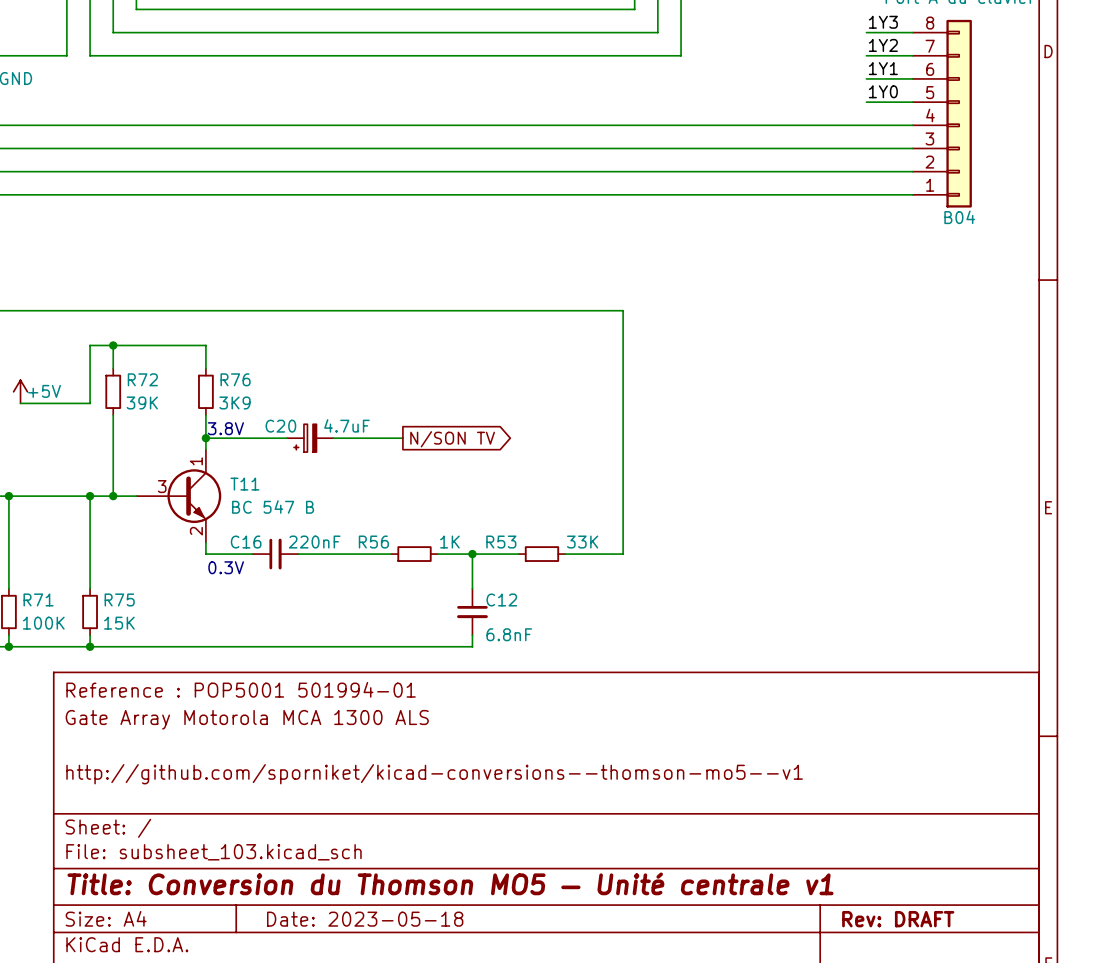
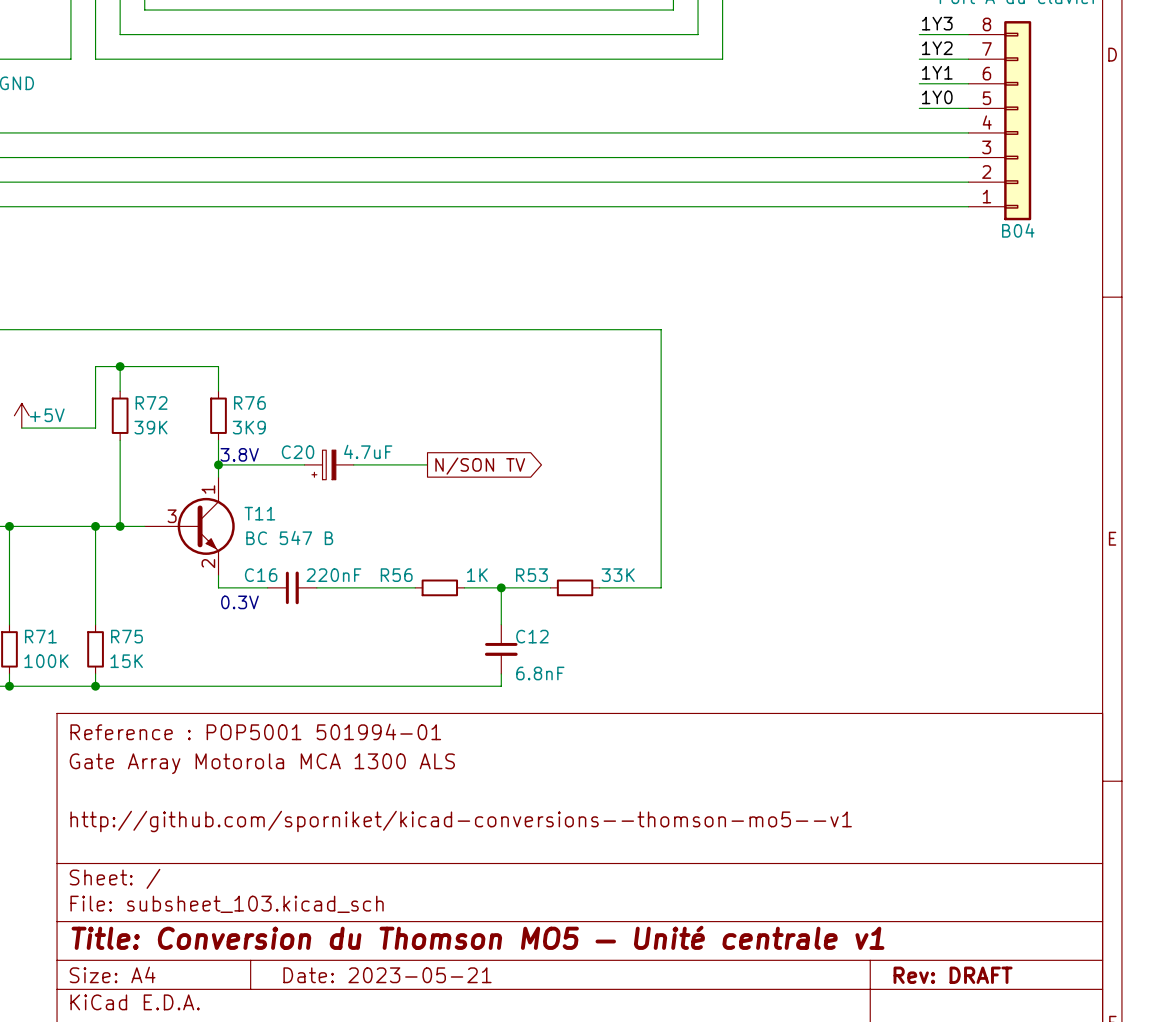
title block: Date: 2023-05-18 (365, 919) -> Date: 2023-05-21 (387, 975)

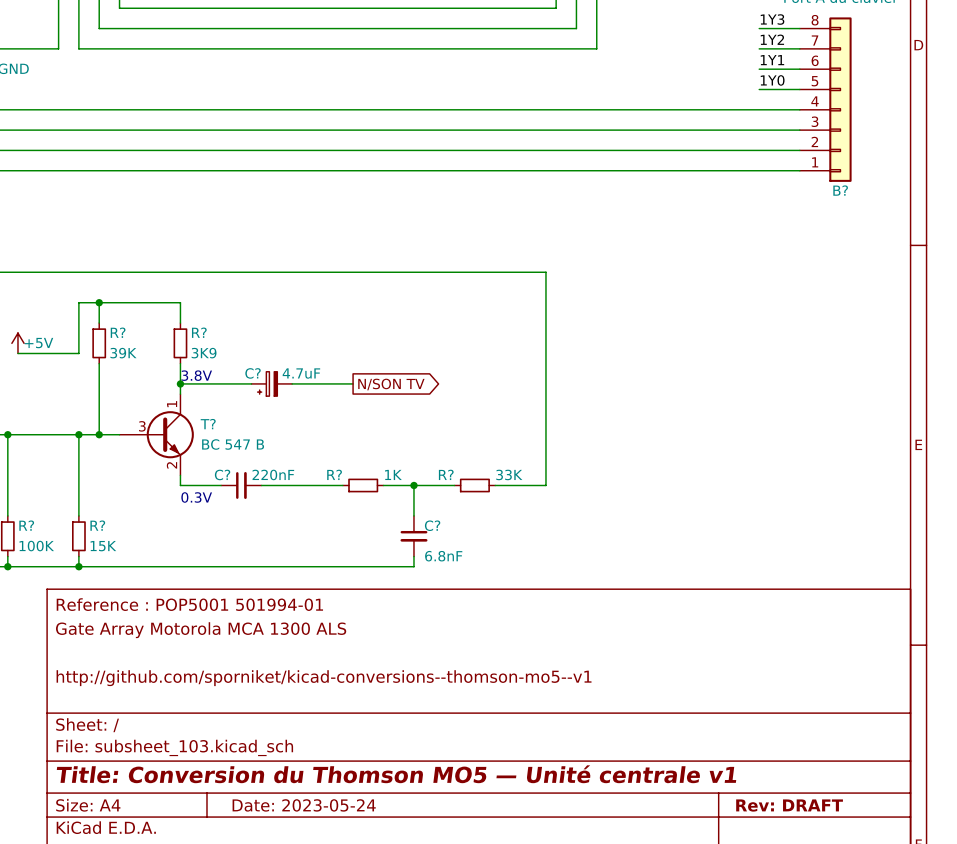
B04 name: B04 (1018, 230) -> B? (840, 190)
R72 name: R72 (151, 402) -> R? (118, 332)
R76 name: R76 (249, 402) -> R? (199, 332)
C20 name: C20 (298, 452) -> C? (253, 373)
T11 name: T11 (259, 513) -> T? (208, 424)
C16 name: C16 (261, 575) -> C? (222, 474)
R56 name: R56 (396, 575) -> R? (334, 474)
R53 name: R53 (531, 575) -> R? (446, 474)
R71 name: R71 (40, 636) -> R? (26, 525)
R75 name: R75 (126, 636) -> R? (97, 525)
C12 name: C12 (532, 636) -> C? (432, 525)
title block: Date: 2023-05-21 (387, 975) -> Date: 2023-05-24 (304, 805)

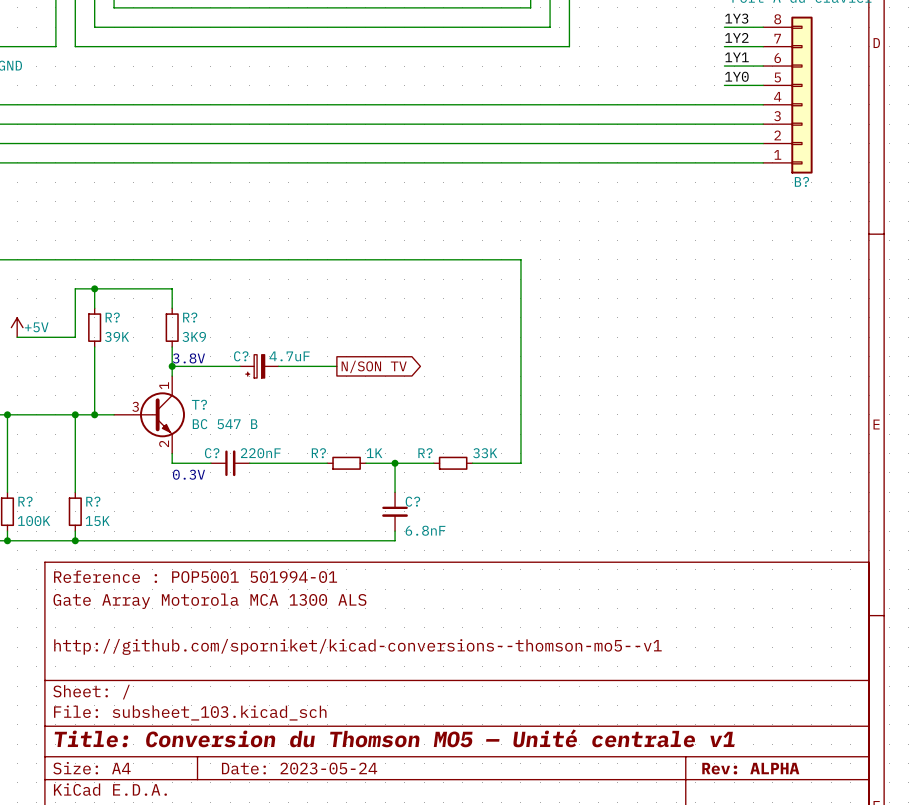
title block: Rev: DRAFT (789, 805) -> Rev: ALPHA (750, 768)

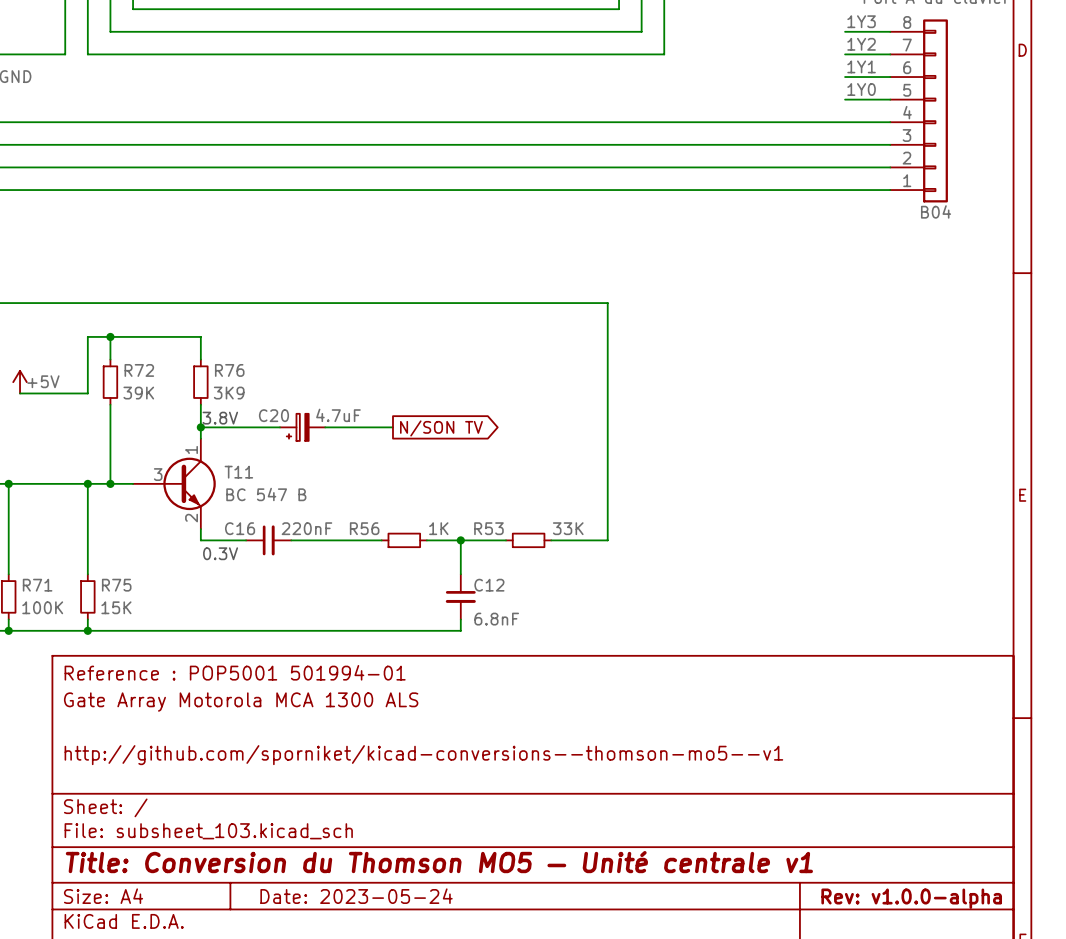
B? name: B? (801, 181) -> B04 (936, 211)
R? name: R? (112, 317) -> R72 (139, 370)
R? name: R? (190, 317) -> R76 (229, 370)
C? name: C? (241, 356) -> C20 (273, 415)
T? name: T? (199, 404) -> T11 (238, 472)
C? name: C? (212, 453) -> C16 (240, 528)
R? name: R? (318, 453) -> R56 (364, 528)
R? name: R? (425, 453) -> R53 (488, 528)
R? name: R? (25, 501) -> R71 (37, 585)
R? name: R? (93, 501) -> R75 (116, 585)
C? name: C? (412, 501) -> C12 (489, 585)
title block: Rev: ALPHA (750, 768) -> Rev: v1.0.0-alpha (911, 898)

